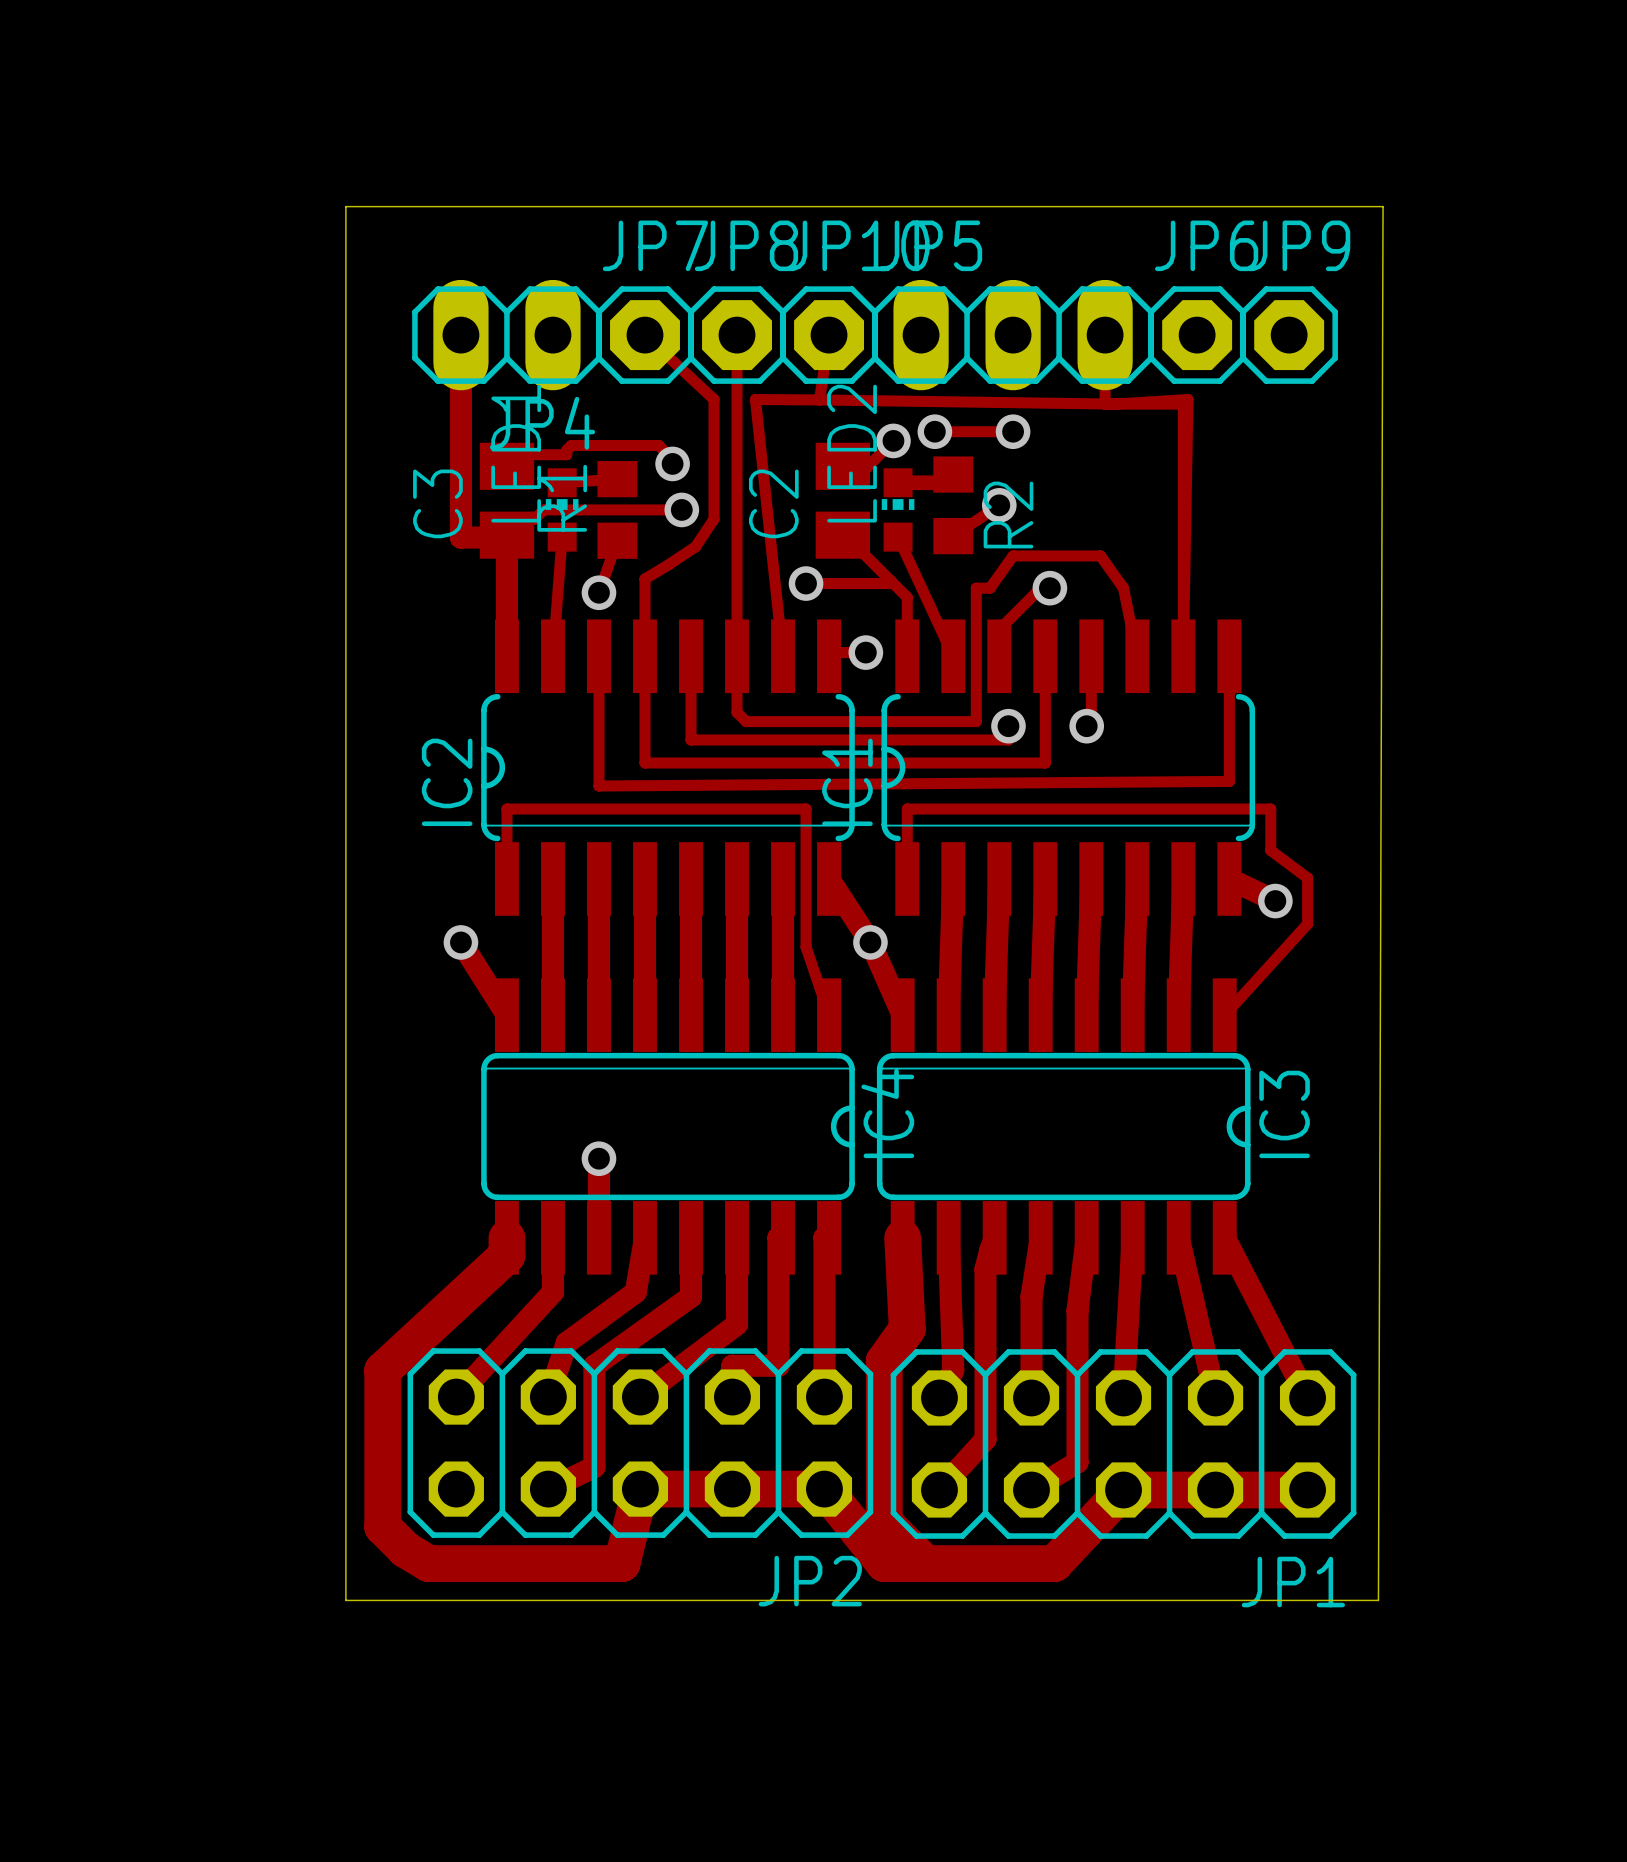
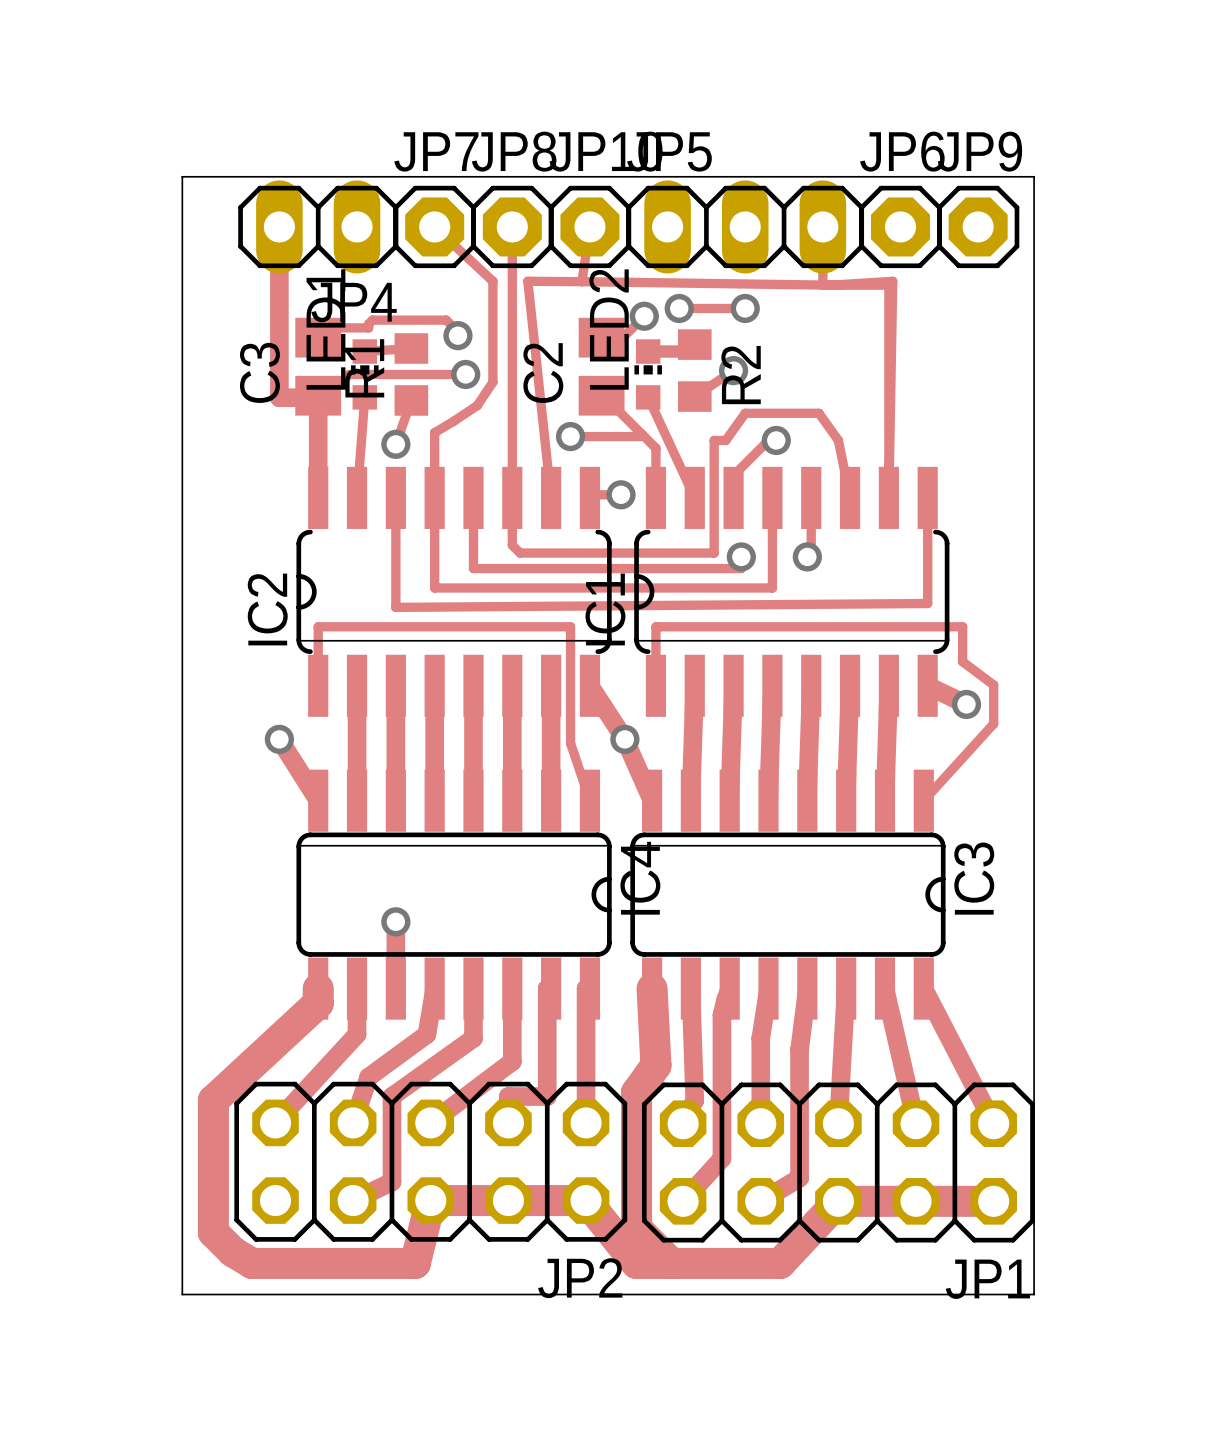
board edge: (345, 275) (345, 206) (1383, 206) (1378, 1600) (1355, 1600) -> (182, 176) (1034, 176) (1034, 1294)

